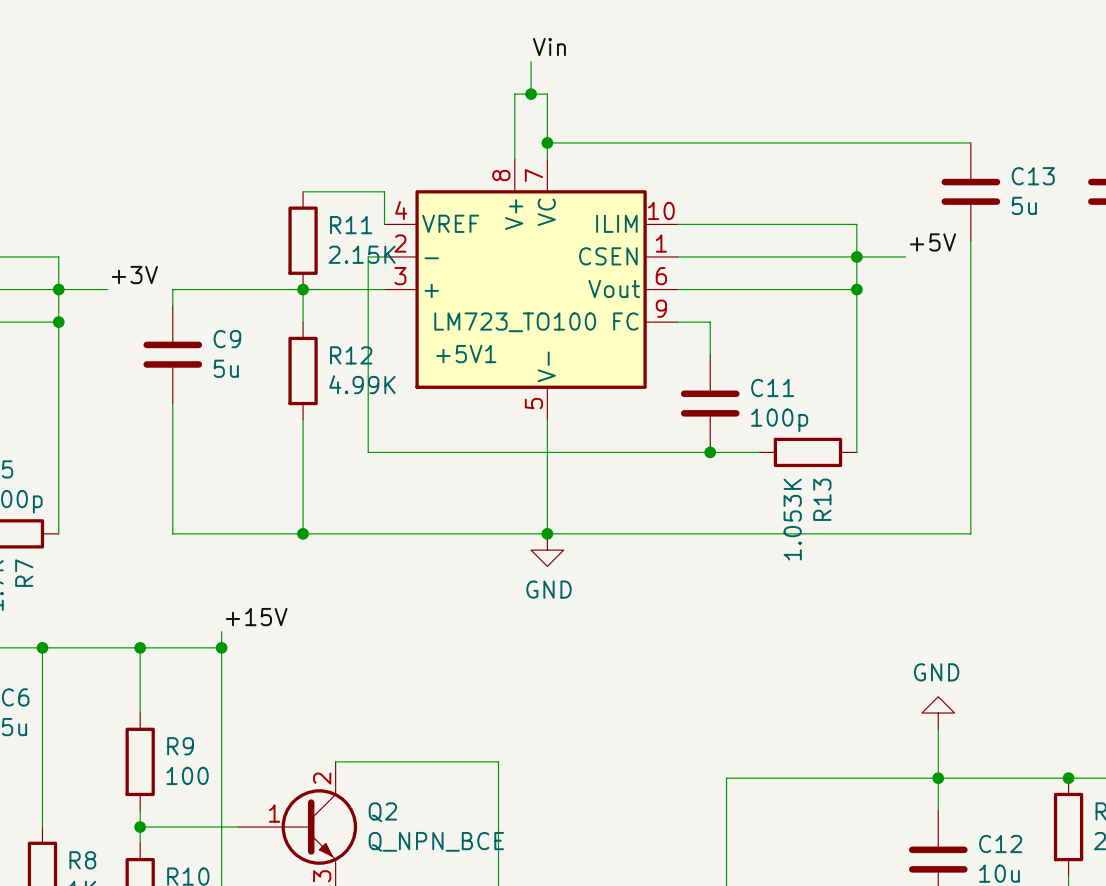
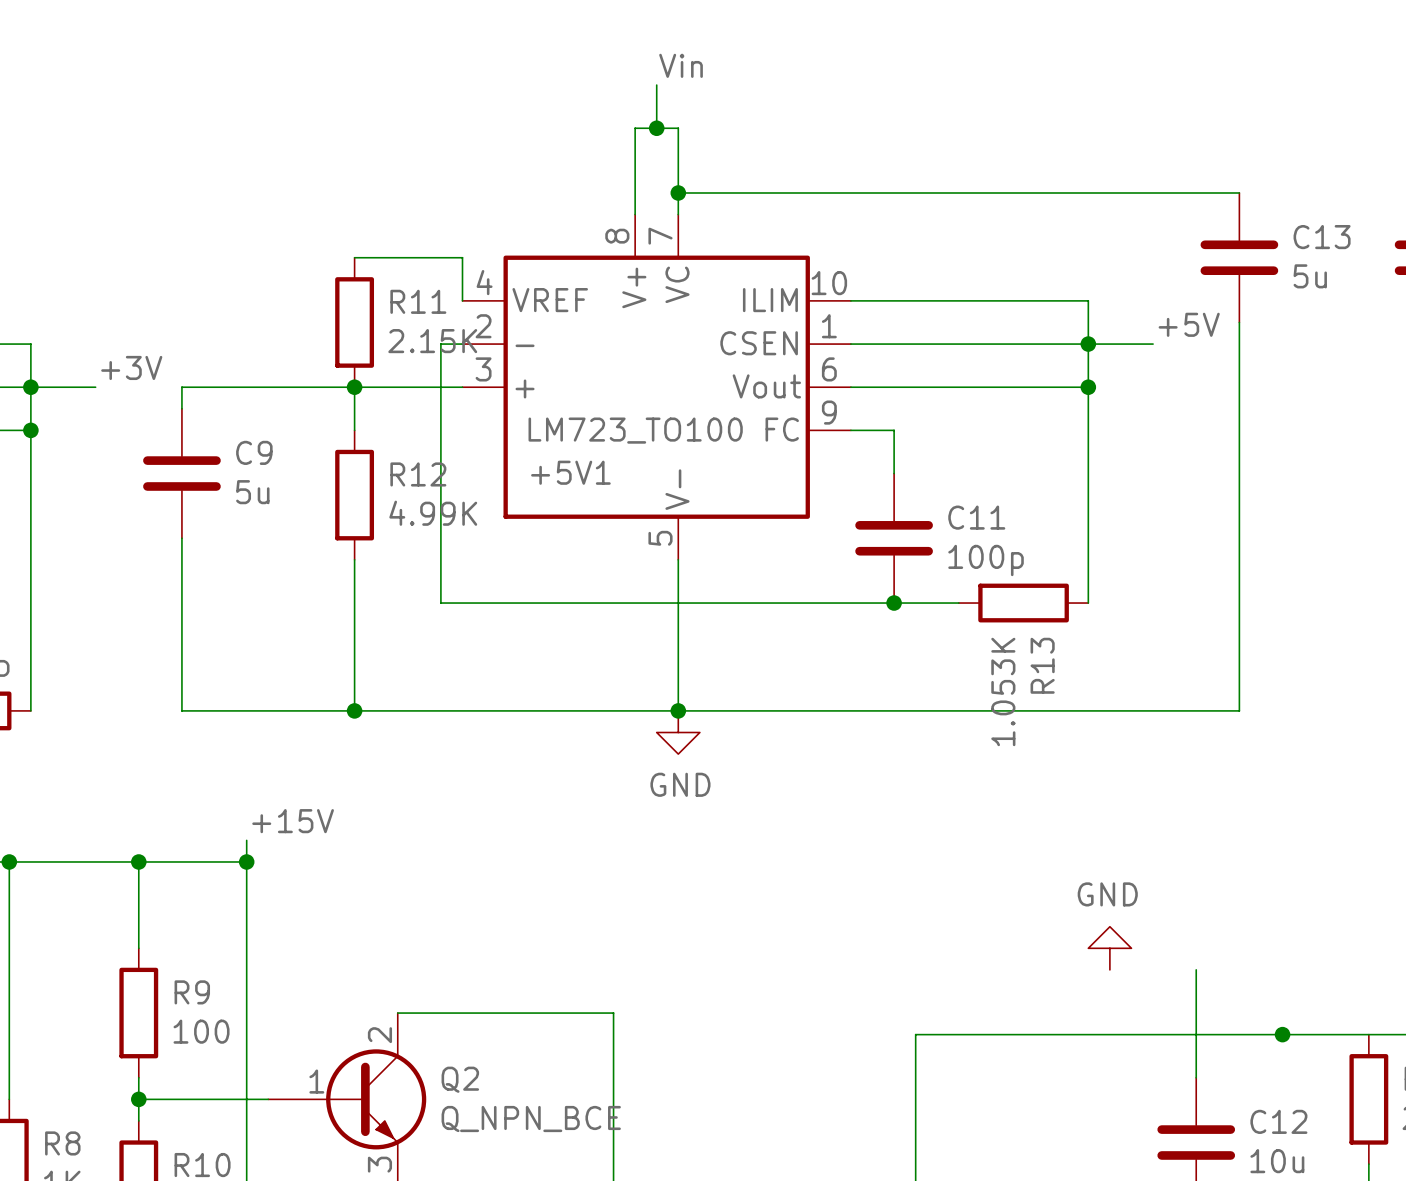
power symbol position: GND (938, 713) -> GND (1109, 948)
junction: (938, 778) -> none
junction: none -> (1282, 1034)
junction: (1068, 778) -> none

